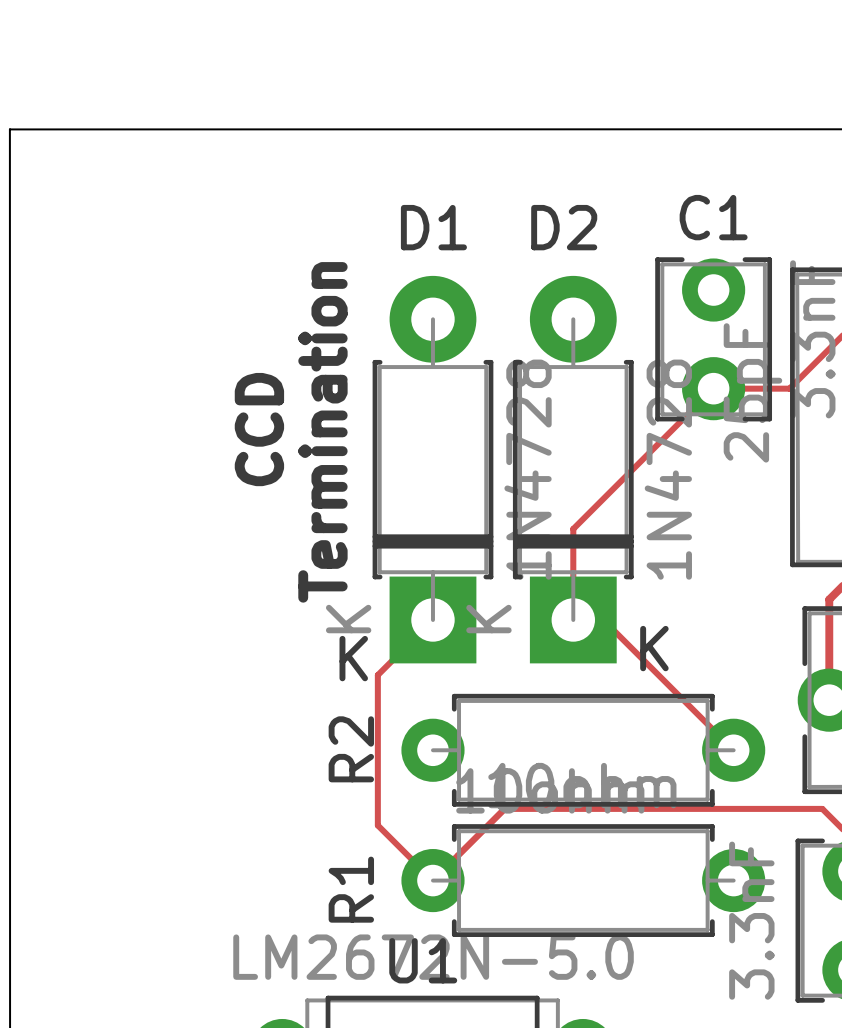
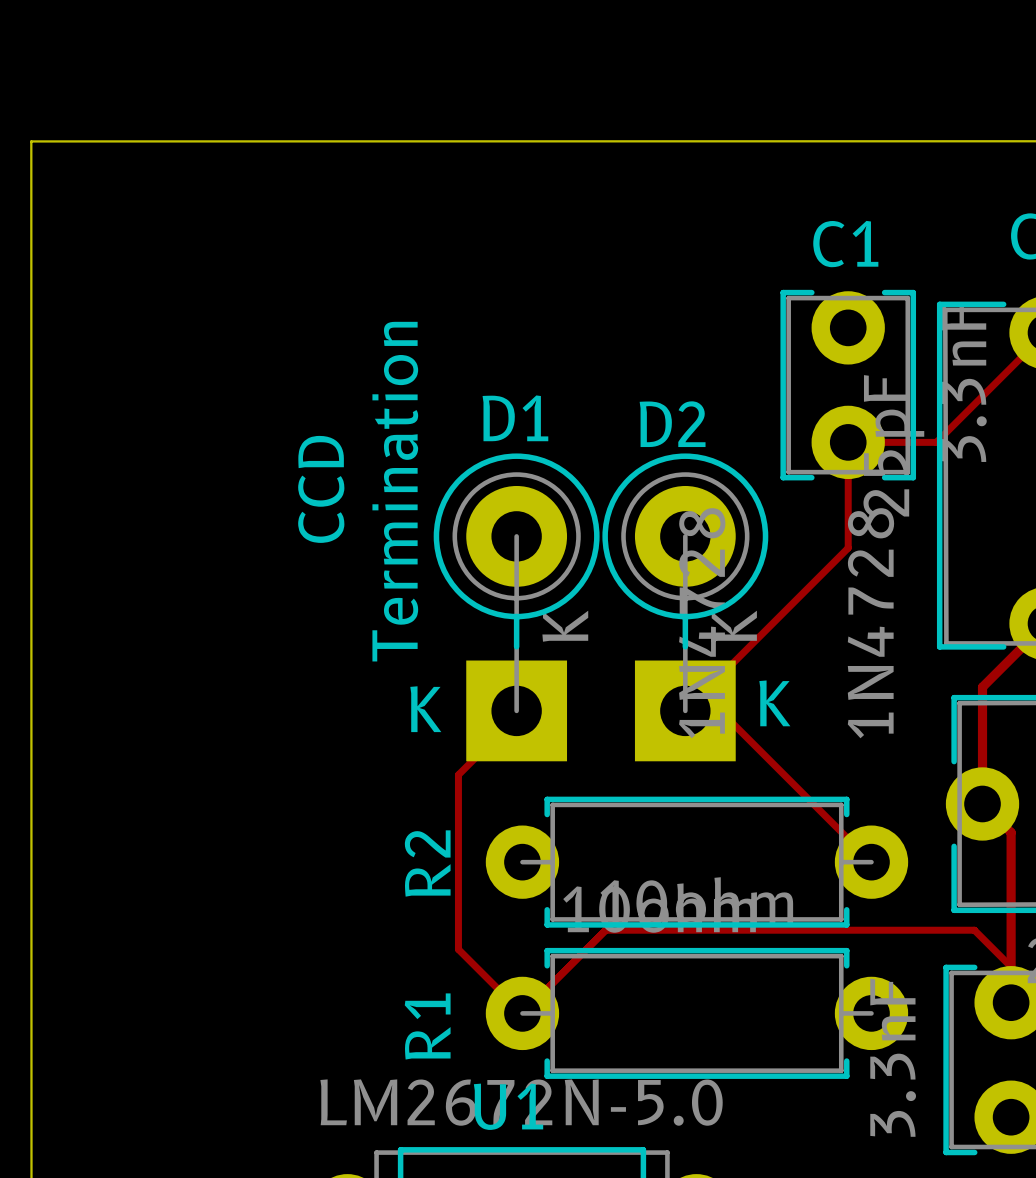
D1 name position: D1 (433, 227) -> D1 (515, 418)
D2 name position: D2 (564, 227) -> D2 (672, 424)
D1 footprint: [372, 275, 494, 664] -> [433, 453, 600, 762]
D2 footprint: [512, 275, 634, 664] -> [602, 453, 769, 762]
track: (713, 388) (573, 528) (573, 619) -> (848, 442) (848, 548) (685, 710)

